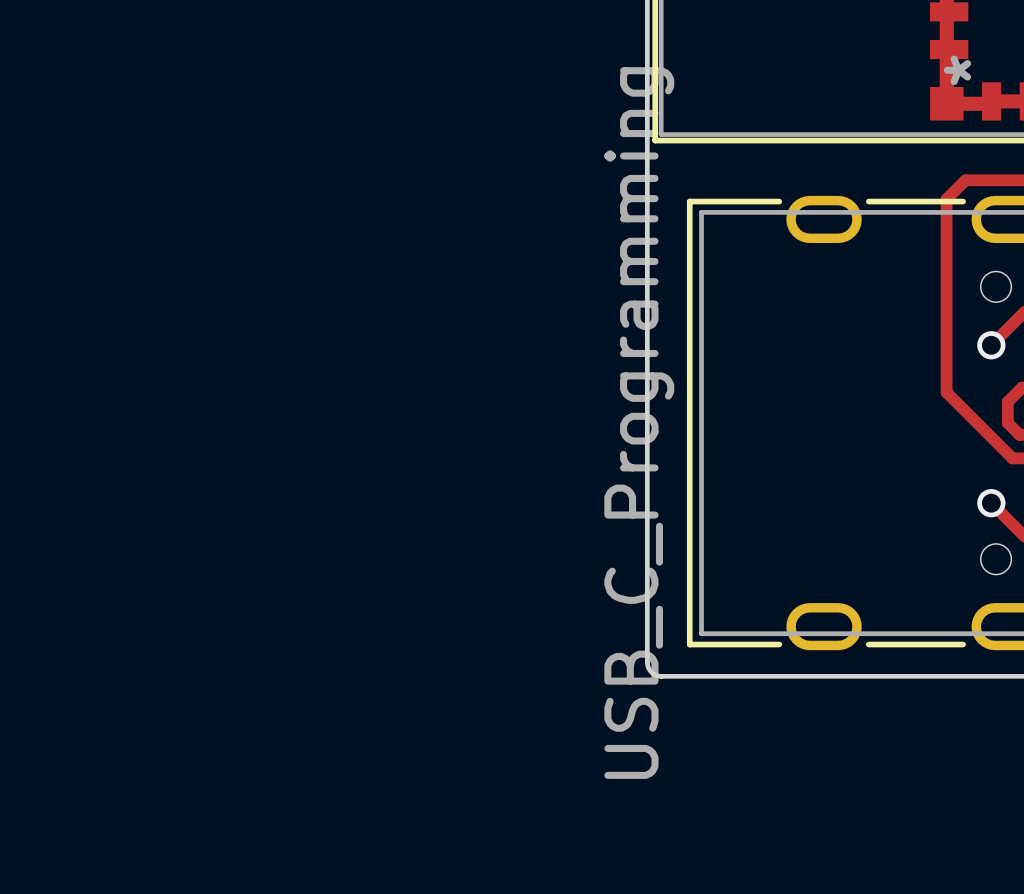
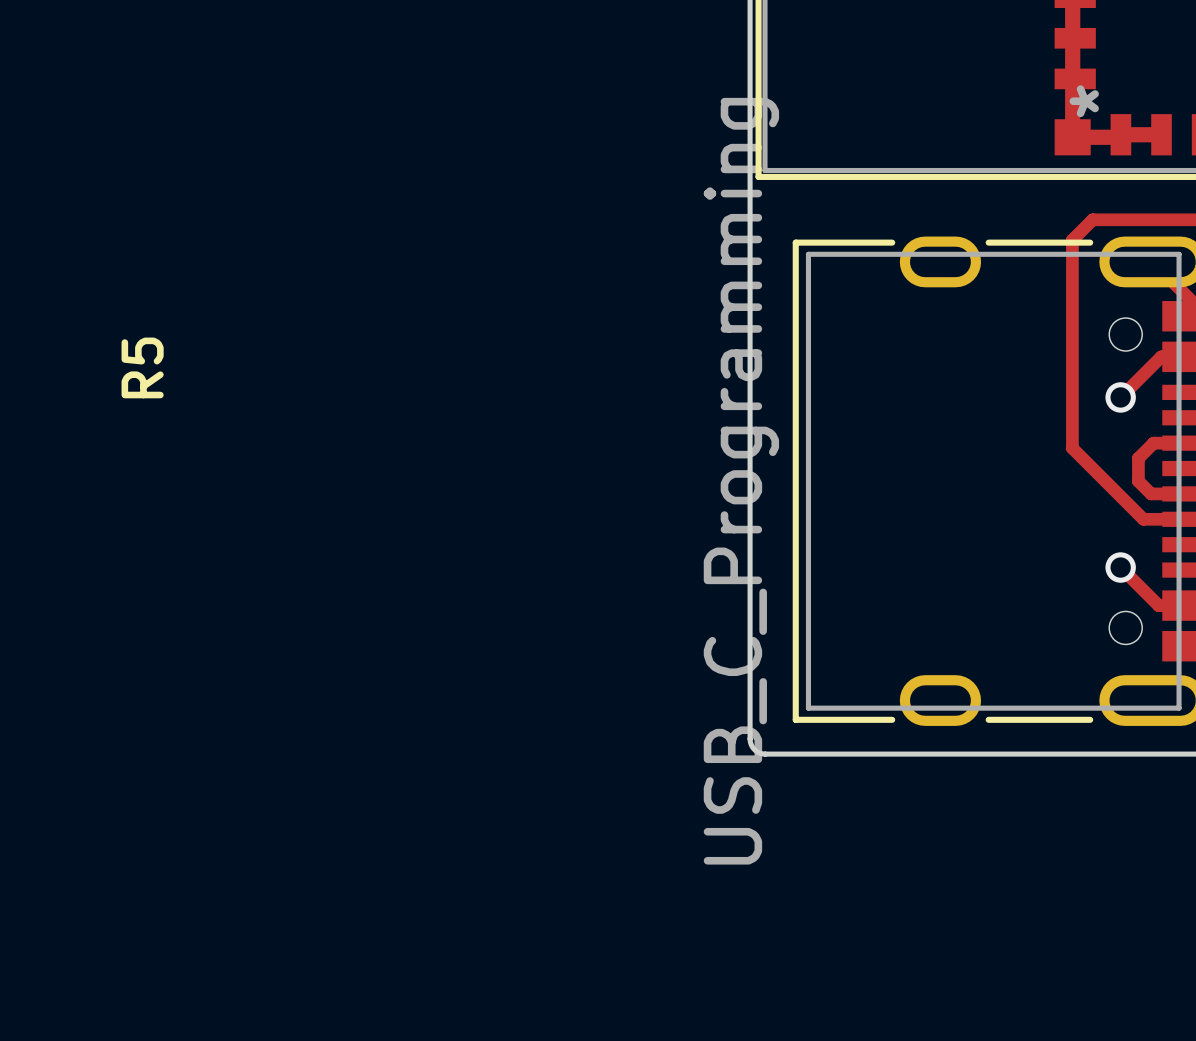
text: none -> R5 (142, 367)

